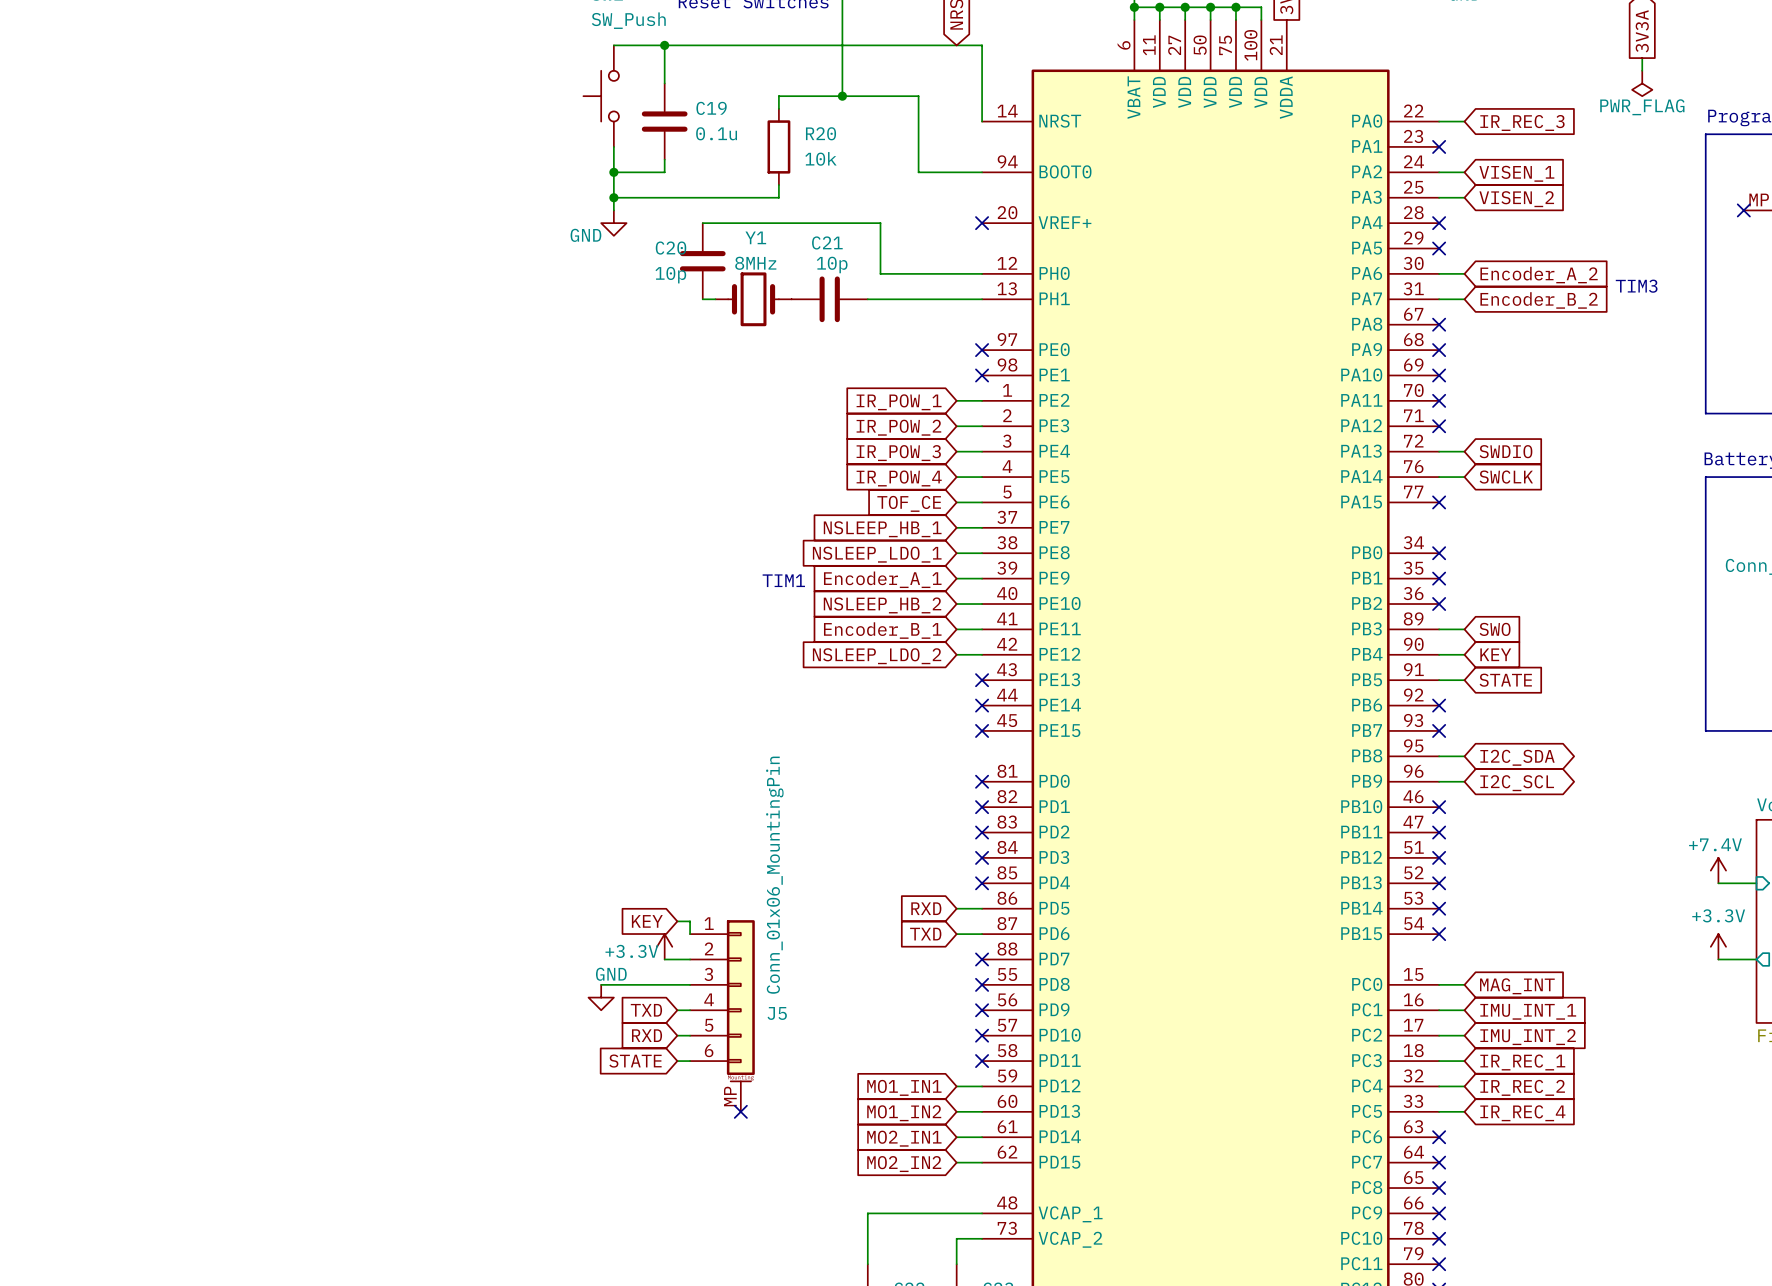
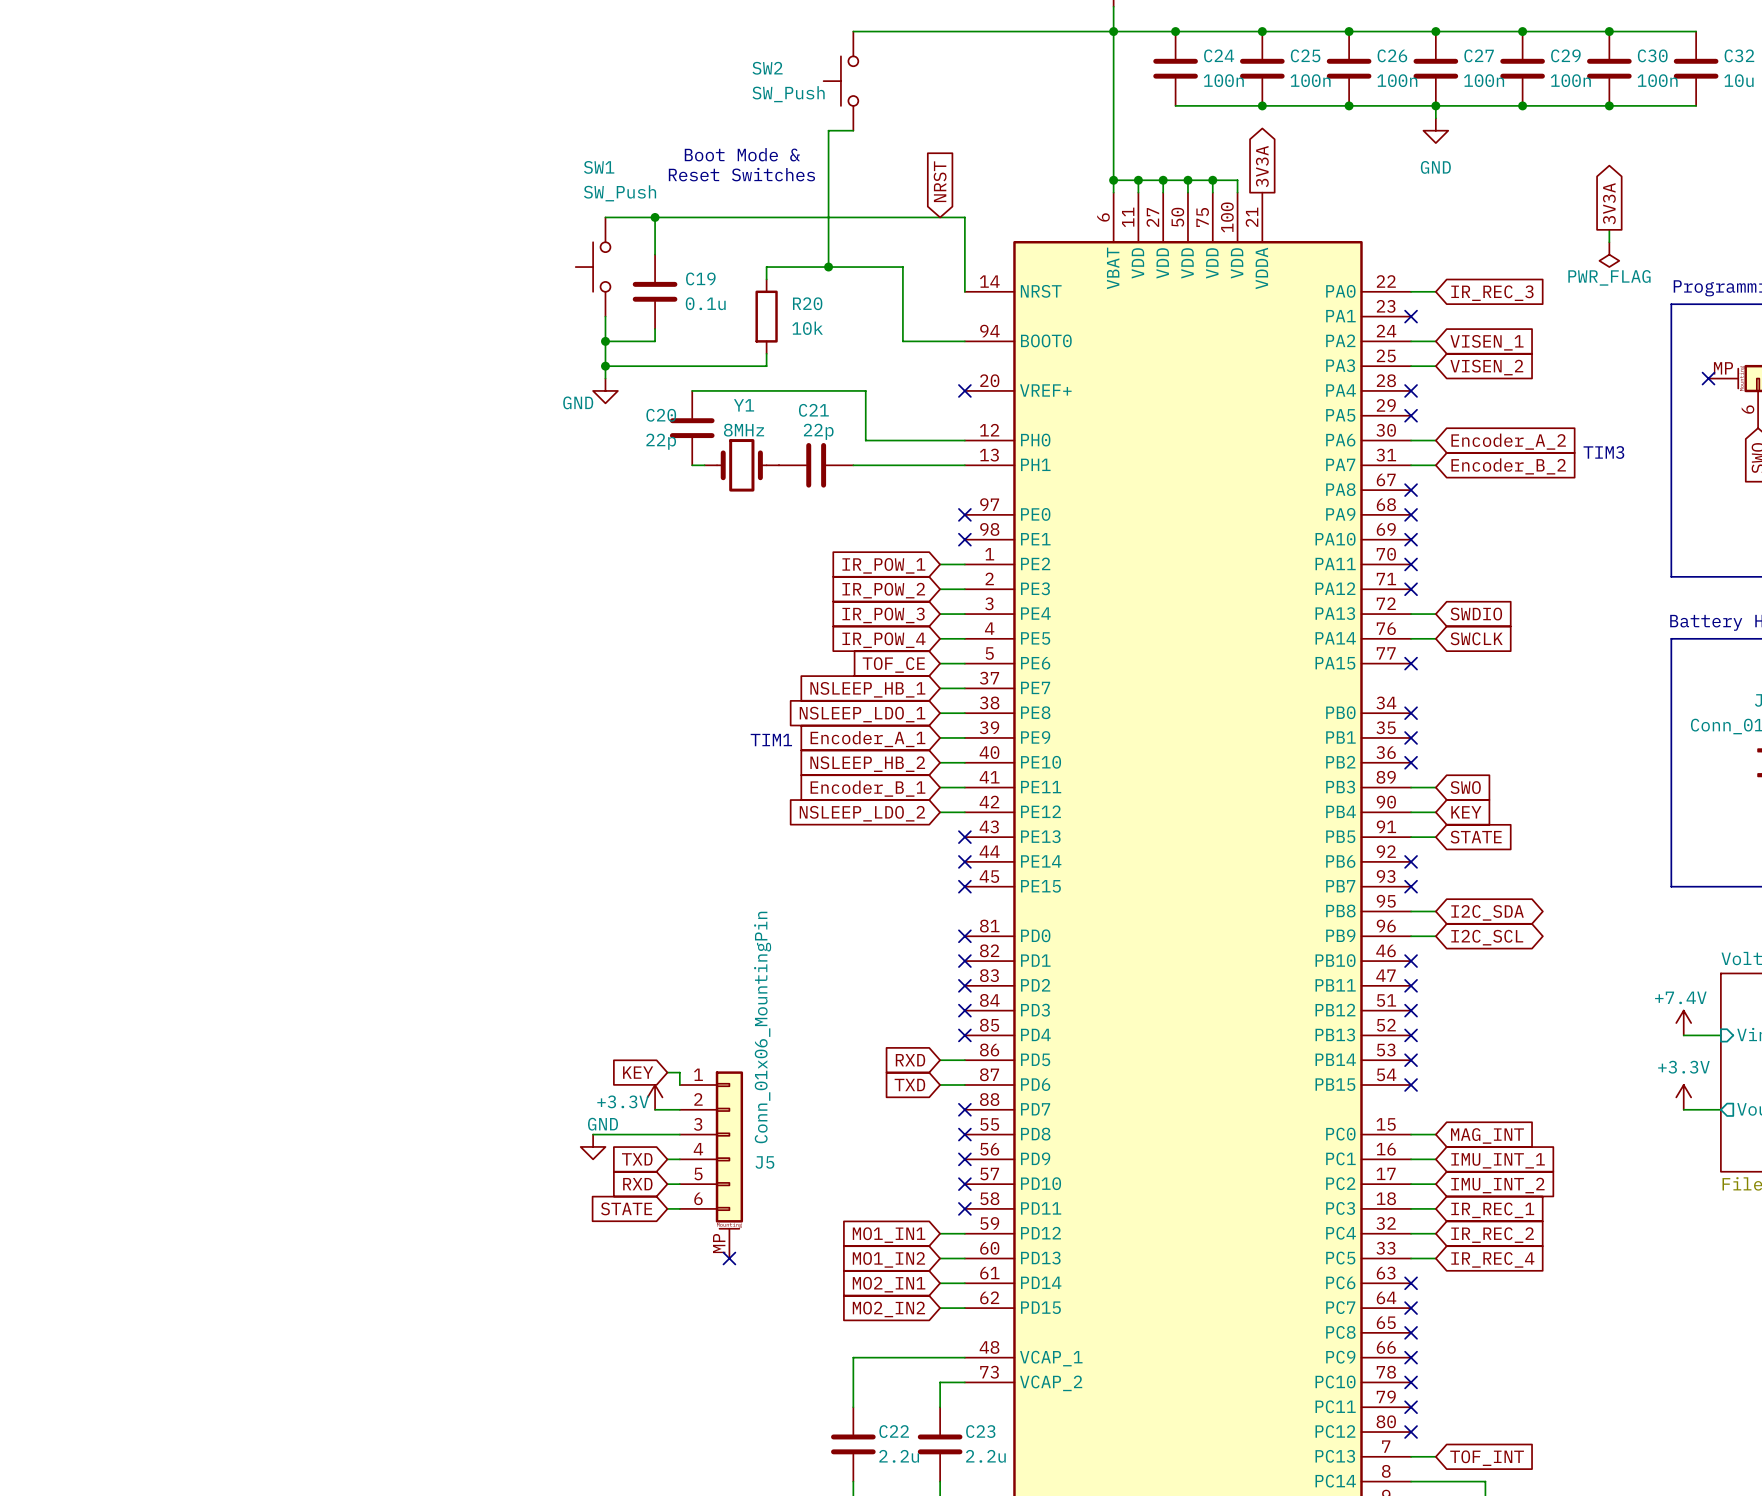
C21 value: 10p (832, 264) -> 22p (818, 431)
C20 value: 10p (670, 275) -> 22p (661, 441)

